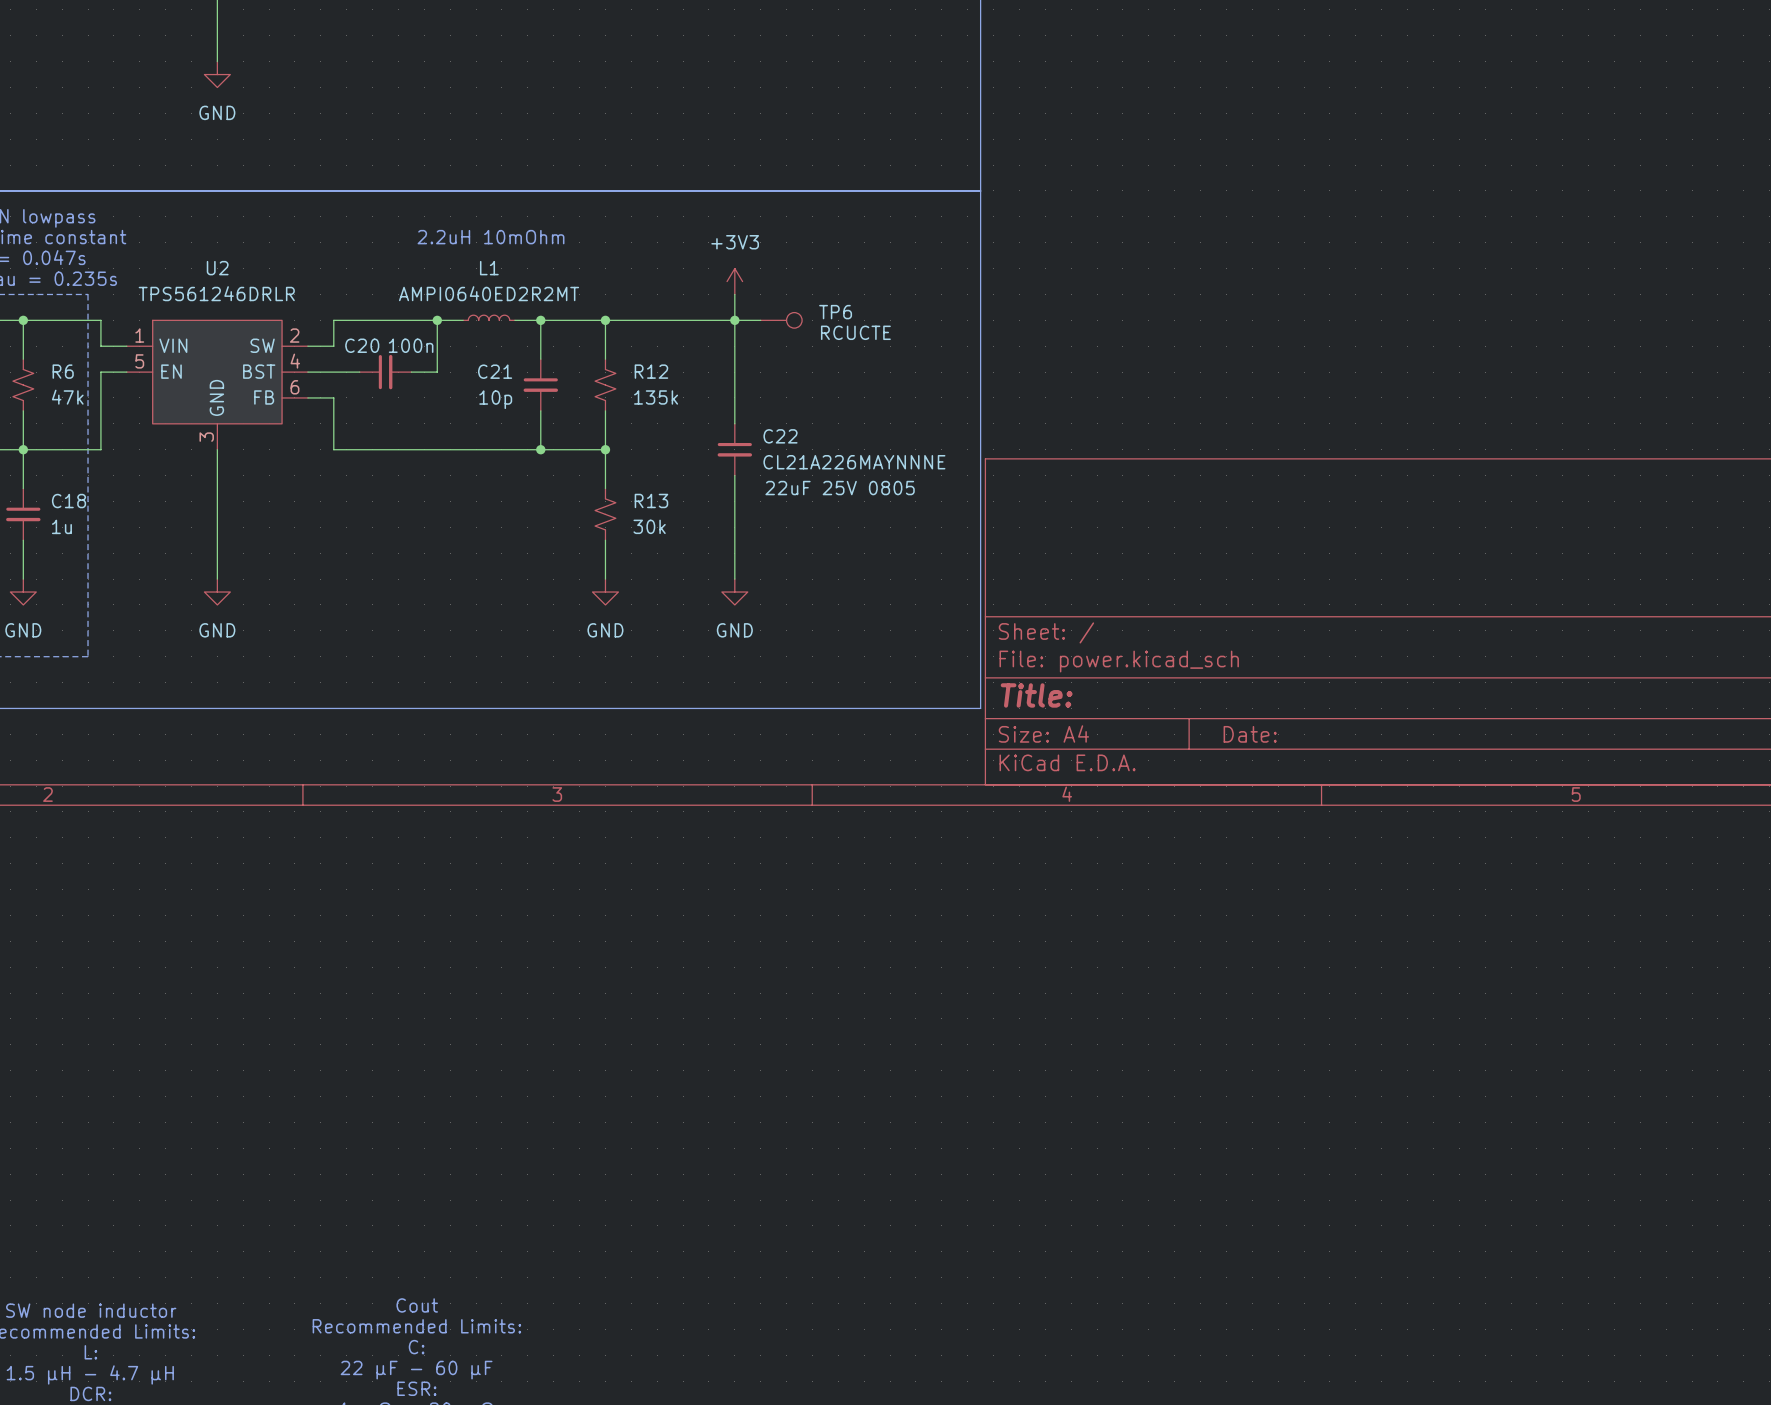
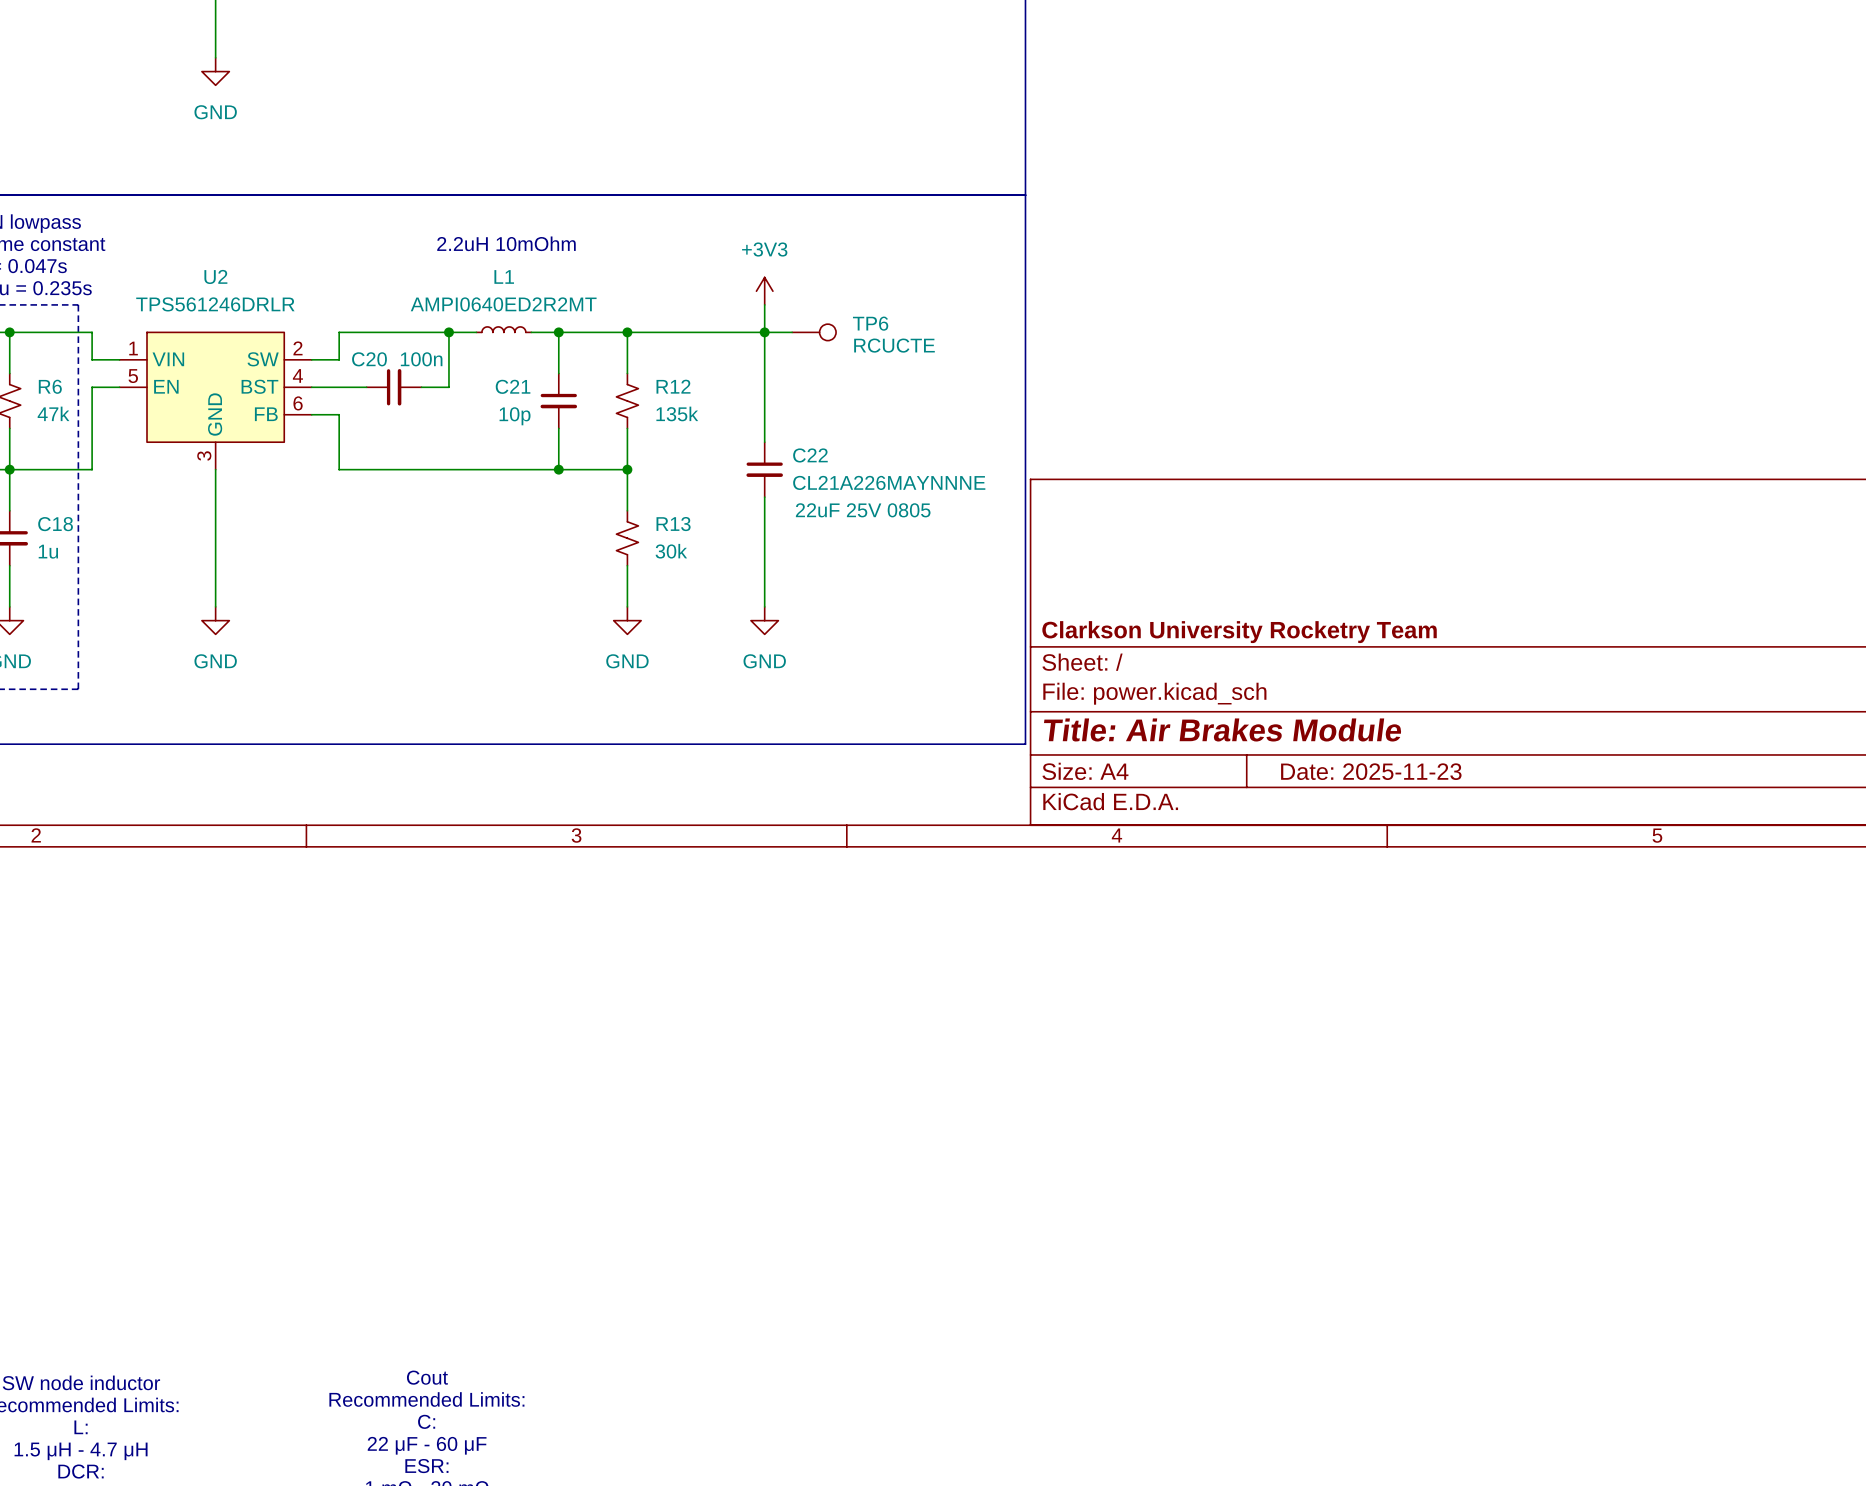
title block: none -> Clarkson University Rocketry Team (1239, 632)
title block: Title: (1036, 695) -> Title: Air Brakes Module (1222, 729)
title block: Date: (1250, 734) -> Date: 2025-11-23 (1371, 771)

